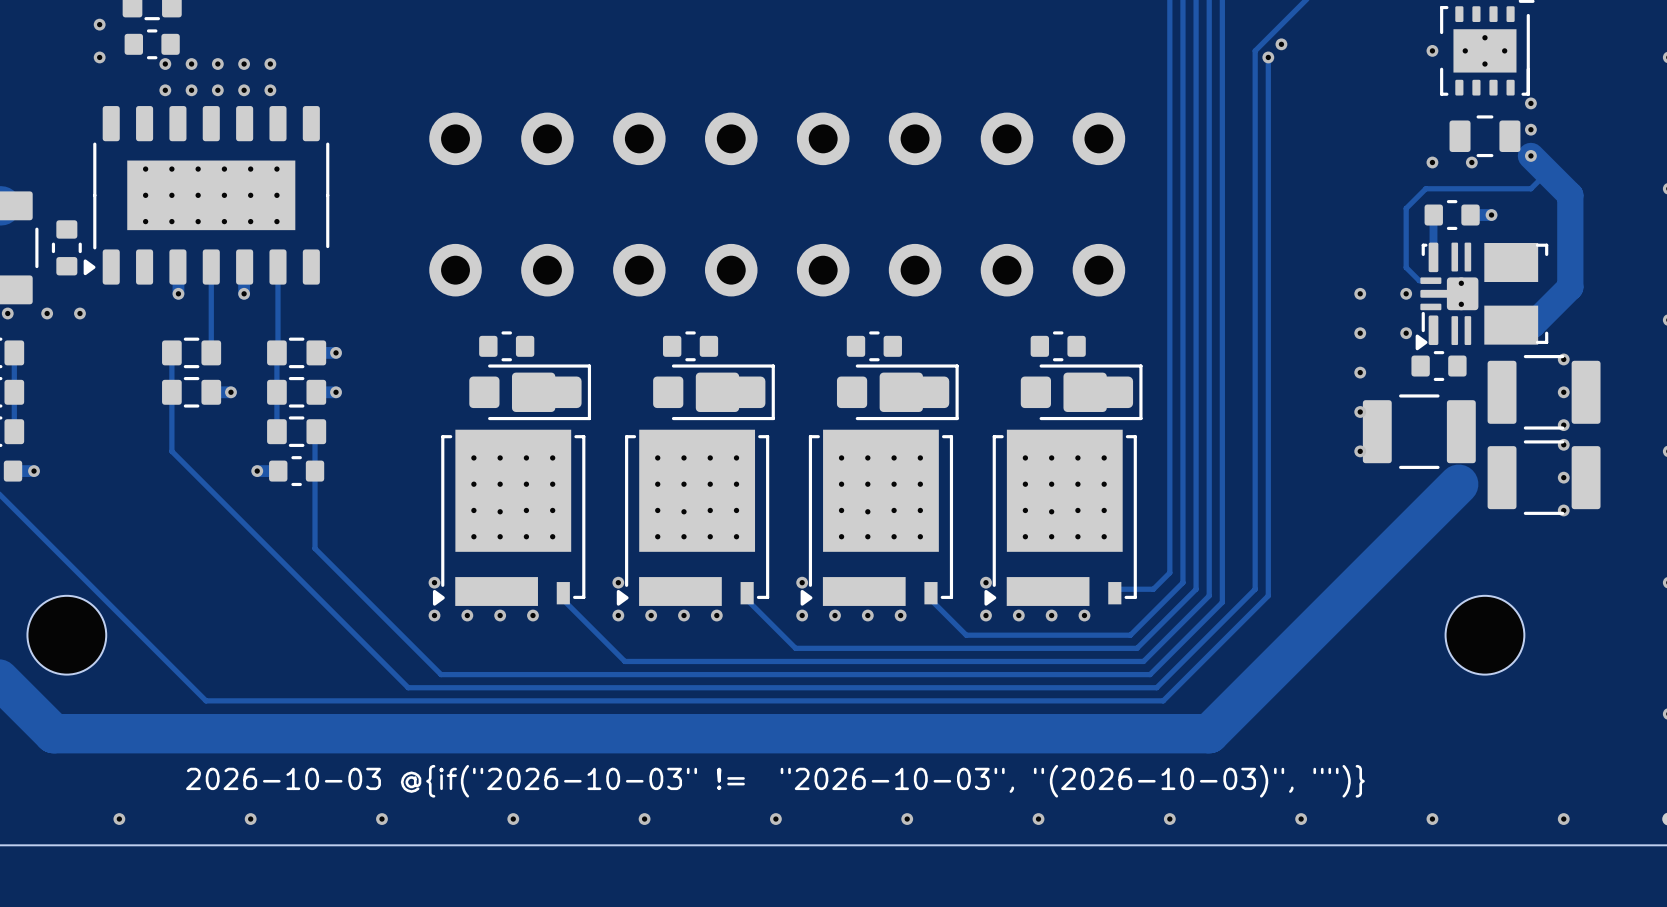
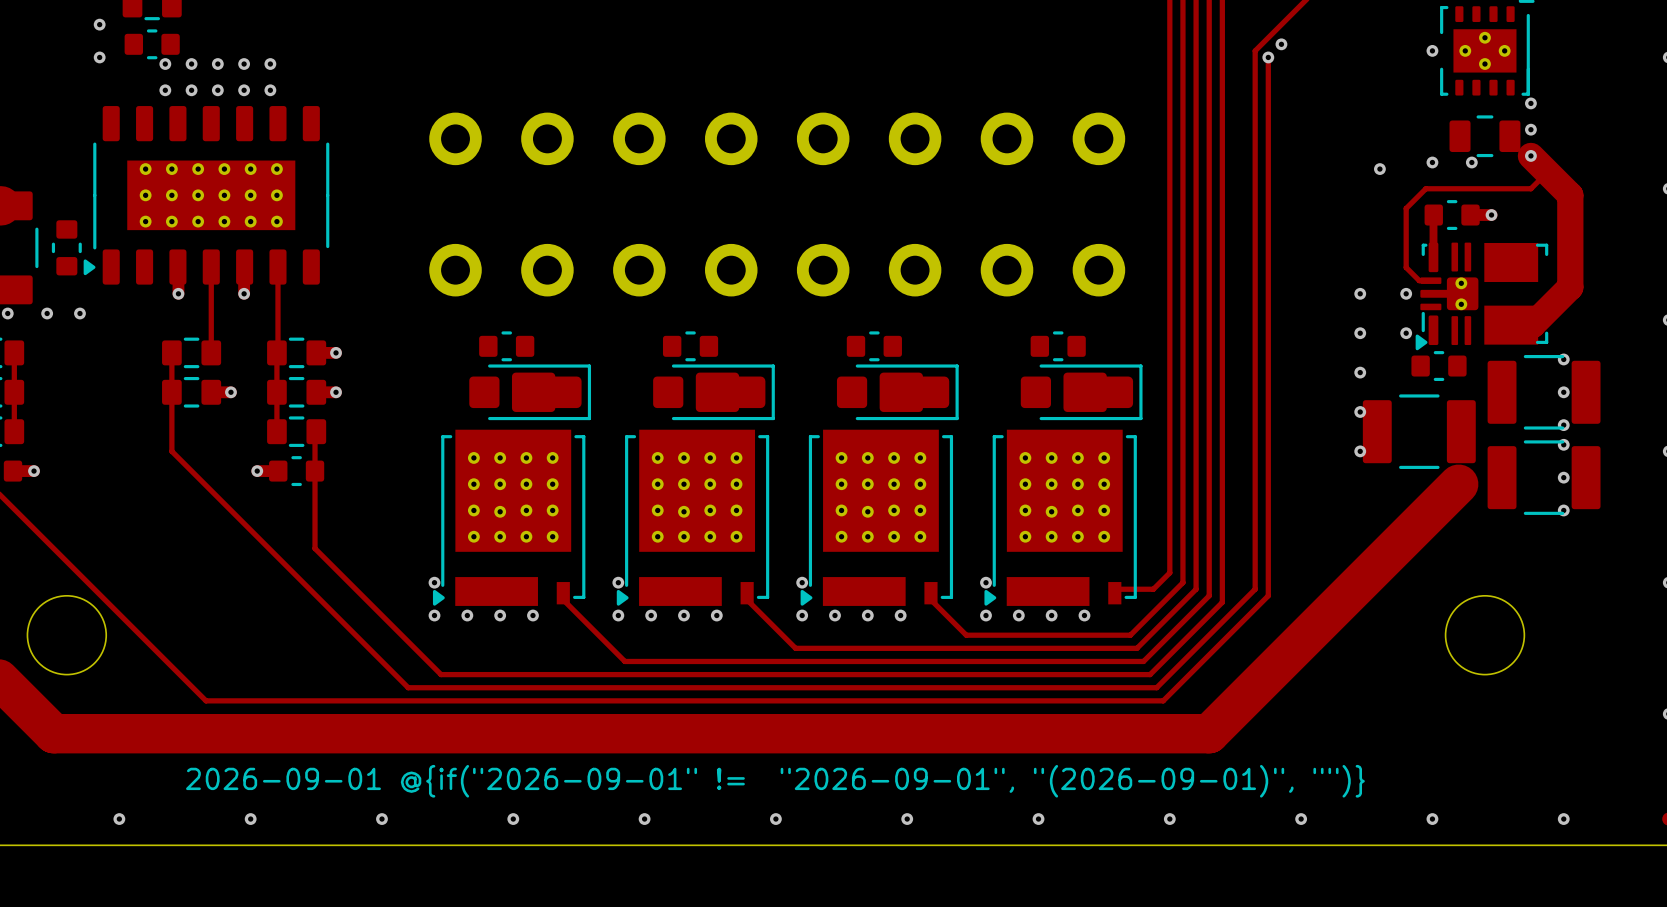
via: none -> (1379, 169)
drawing shape: [186, 764, 1365, 798] -> [186, 764, 1365, 798]

